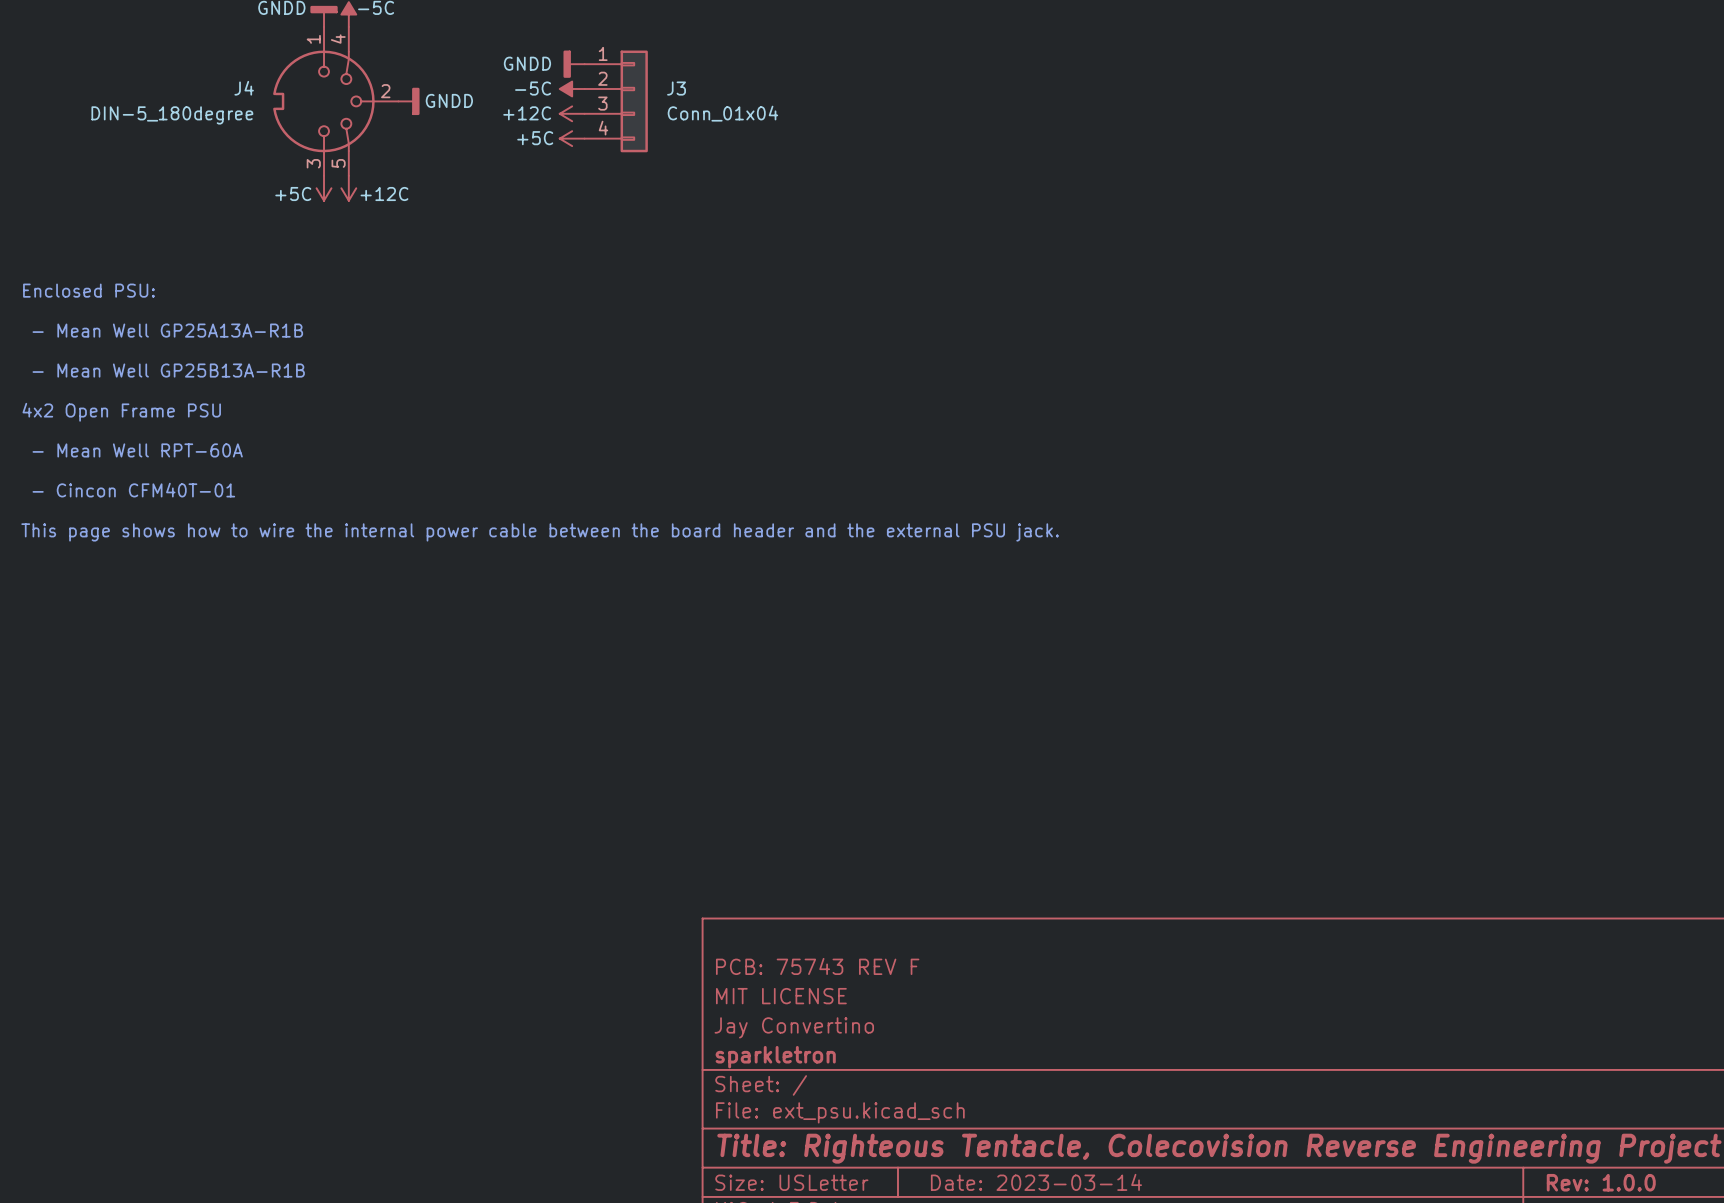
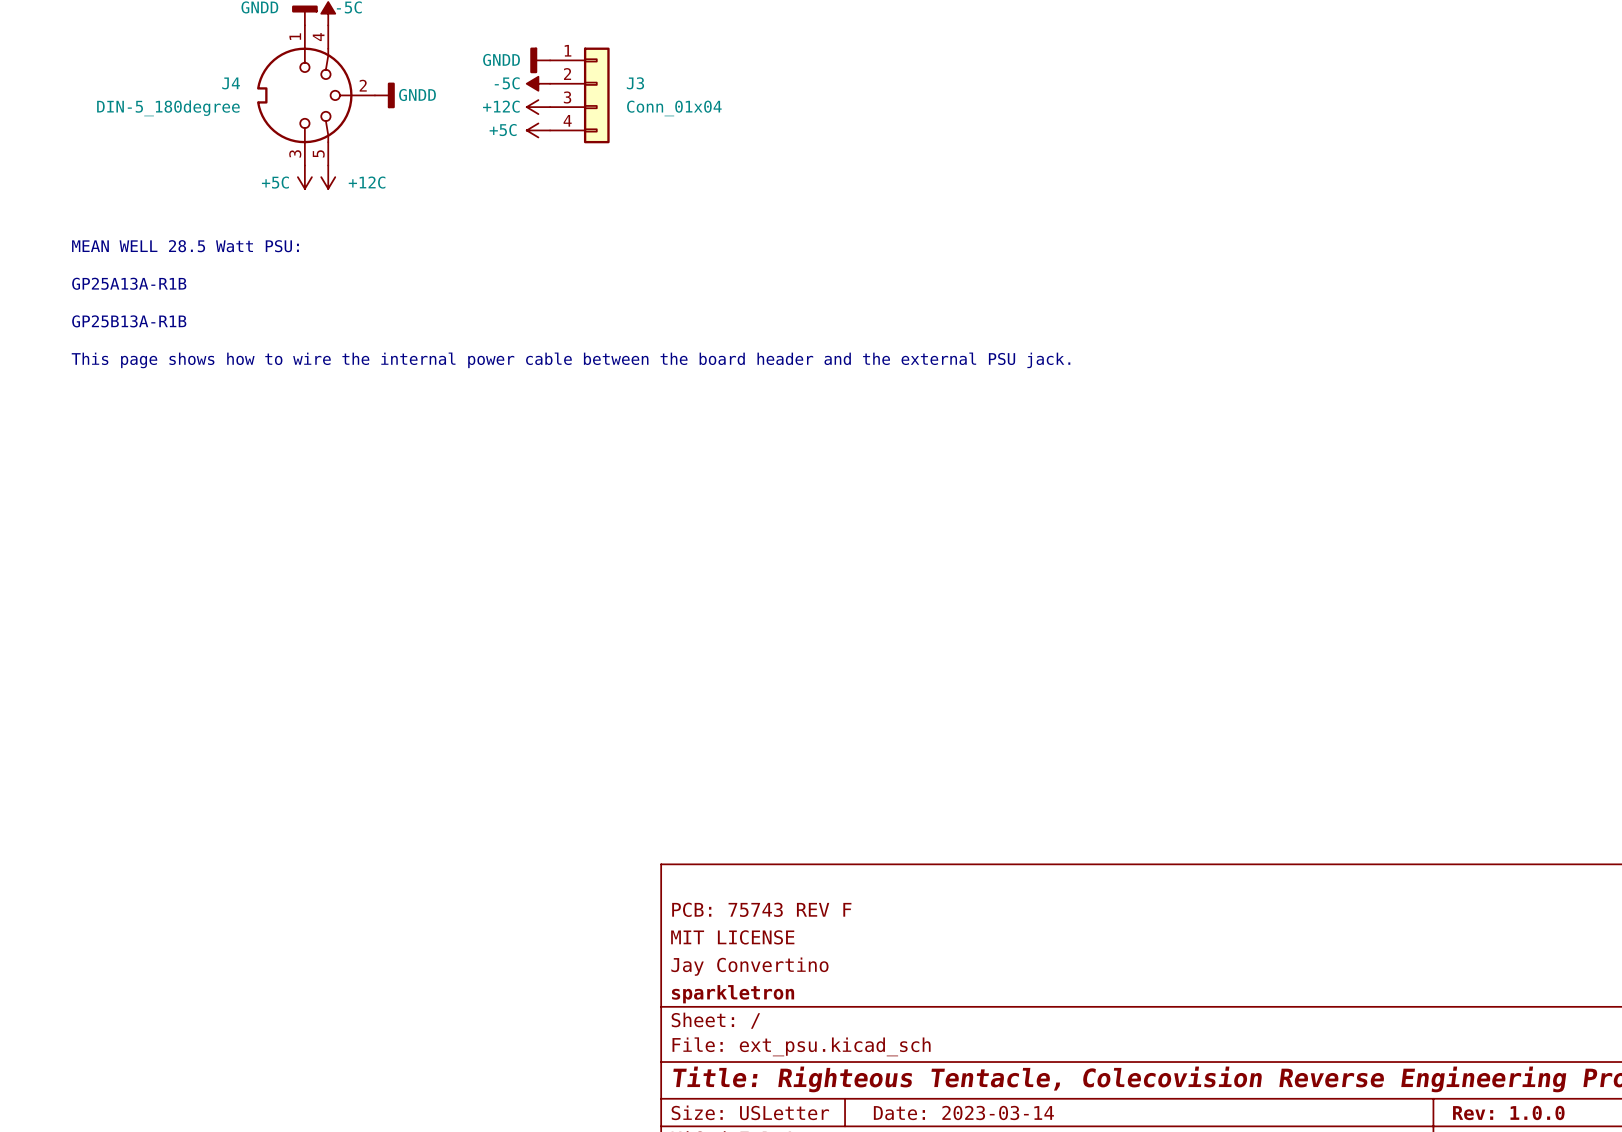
text: none -> MEAN WELL 28.5 Watt PSU: (185, 246)
text: Enclosed PSU: (88, 290) -> none
text: none -> GP25A13A-R1B (129, 283)
text: - Mean Well GP25A13A-R1B (167, 330) -> none
text: none -> GP25B13A-R1B (129, 321)
text: - Mean Well GP25B13A-R1B (168, 370) -> none
text: 4x2 Open Frame PSU (121, 412) -> none
text: - Mean Well RPT-60A (137, 450) -> none
text: - Cincon CFM40T-01 (133, 490) -> none
text position: This page shows how to wire the internal power cable between the board header and the external PSU jack. (540, 532) -> This page shows how to wire the internal power cable between the board header and the external PSU jack. (571, 360)

